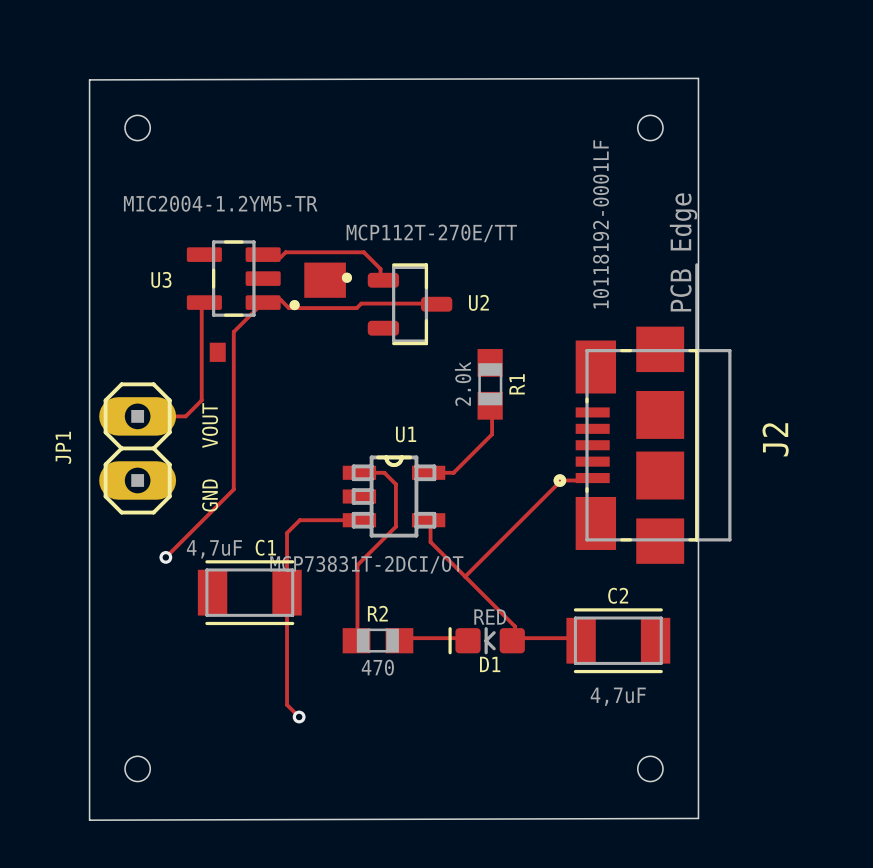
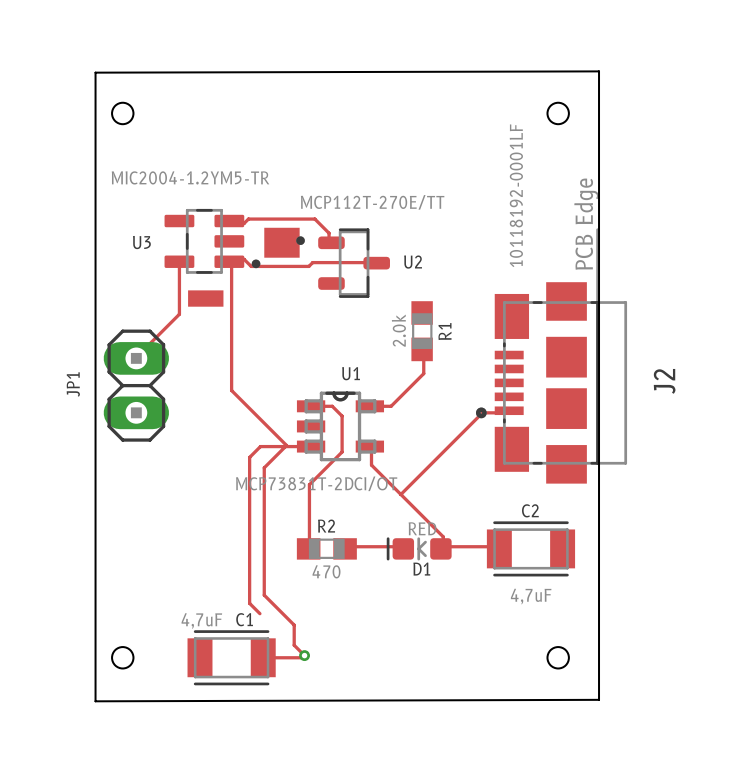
board edge: (698, 78) (89, 79) (89, 820) (105, 820) -> (599, 71) (95, 72) (95, 701)
track: (204, 302) (201, 306) (201, 400) (185, 416) (137, 416) -> (179, 261) (179, 314) (136, 358)
track: (263, 302) (233, 331) (233, 489) (165, 557) -> none
track: none -> (231, 263) (231, 390) (286, 445) (264, 467) (264, 595) (294, 625) (294, 645) (304, 655) (304, 657) (263, 657)
drawing shape: [209, 342, 226, 362] -> [188, 290, 224, 307]
text: VOUT (210, 425) -> none
JP1 position: (137, 448) -> (136, 385)
text: GND (210, 495) -> none
via: (165, 557) -> none
C1 position: (249, 592) -> (231, 657)
via position: (299, 716) -> (304, 655)

